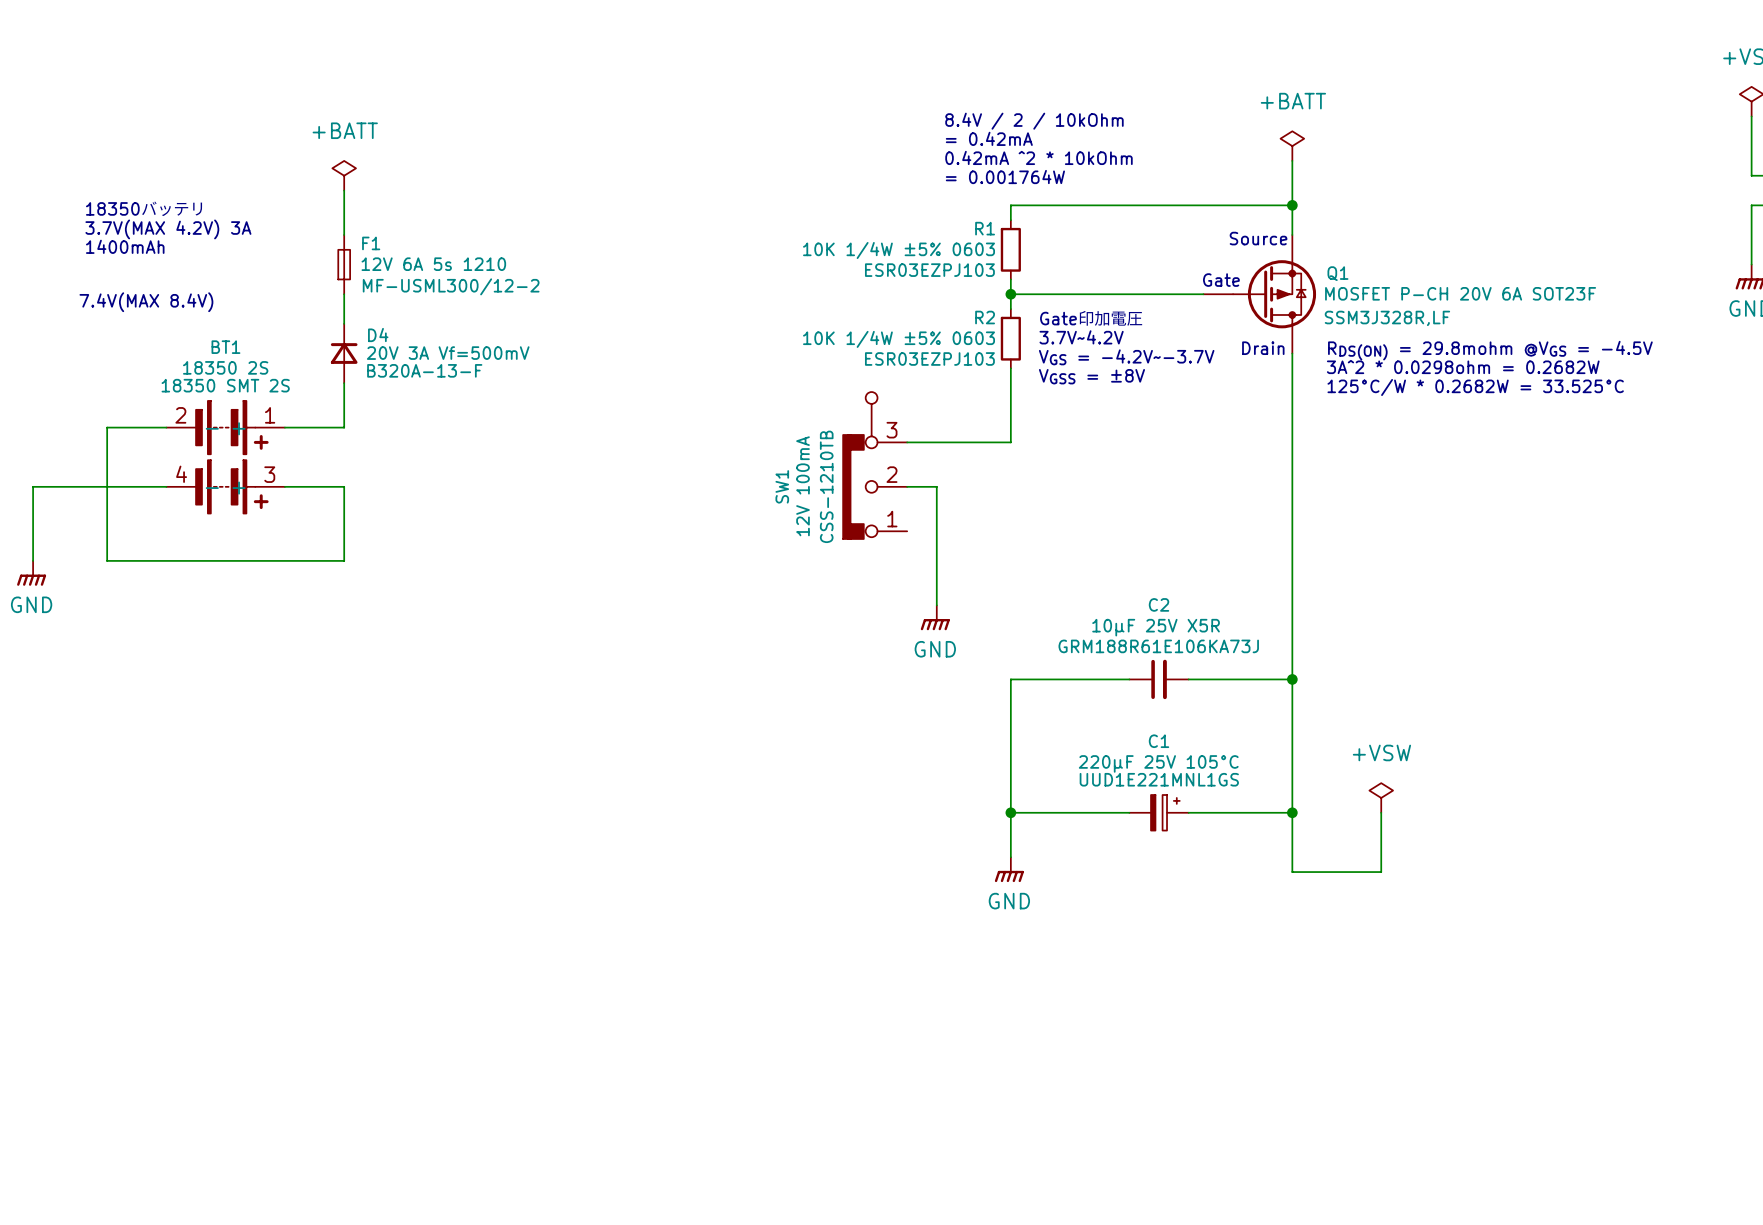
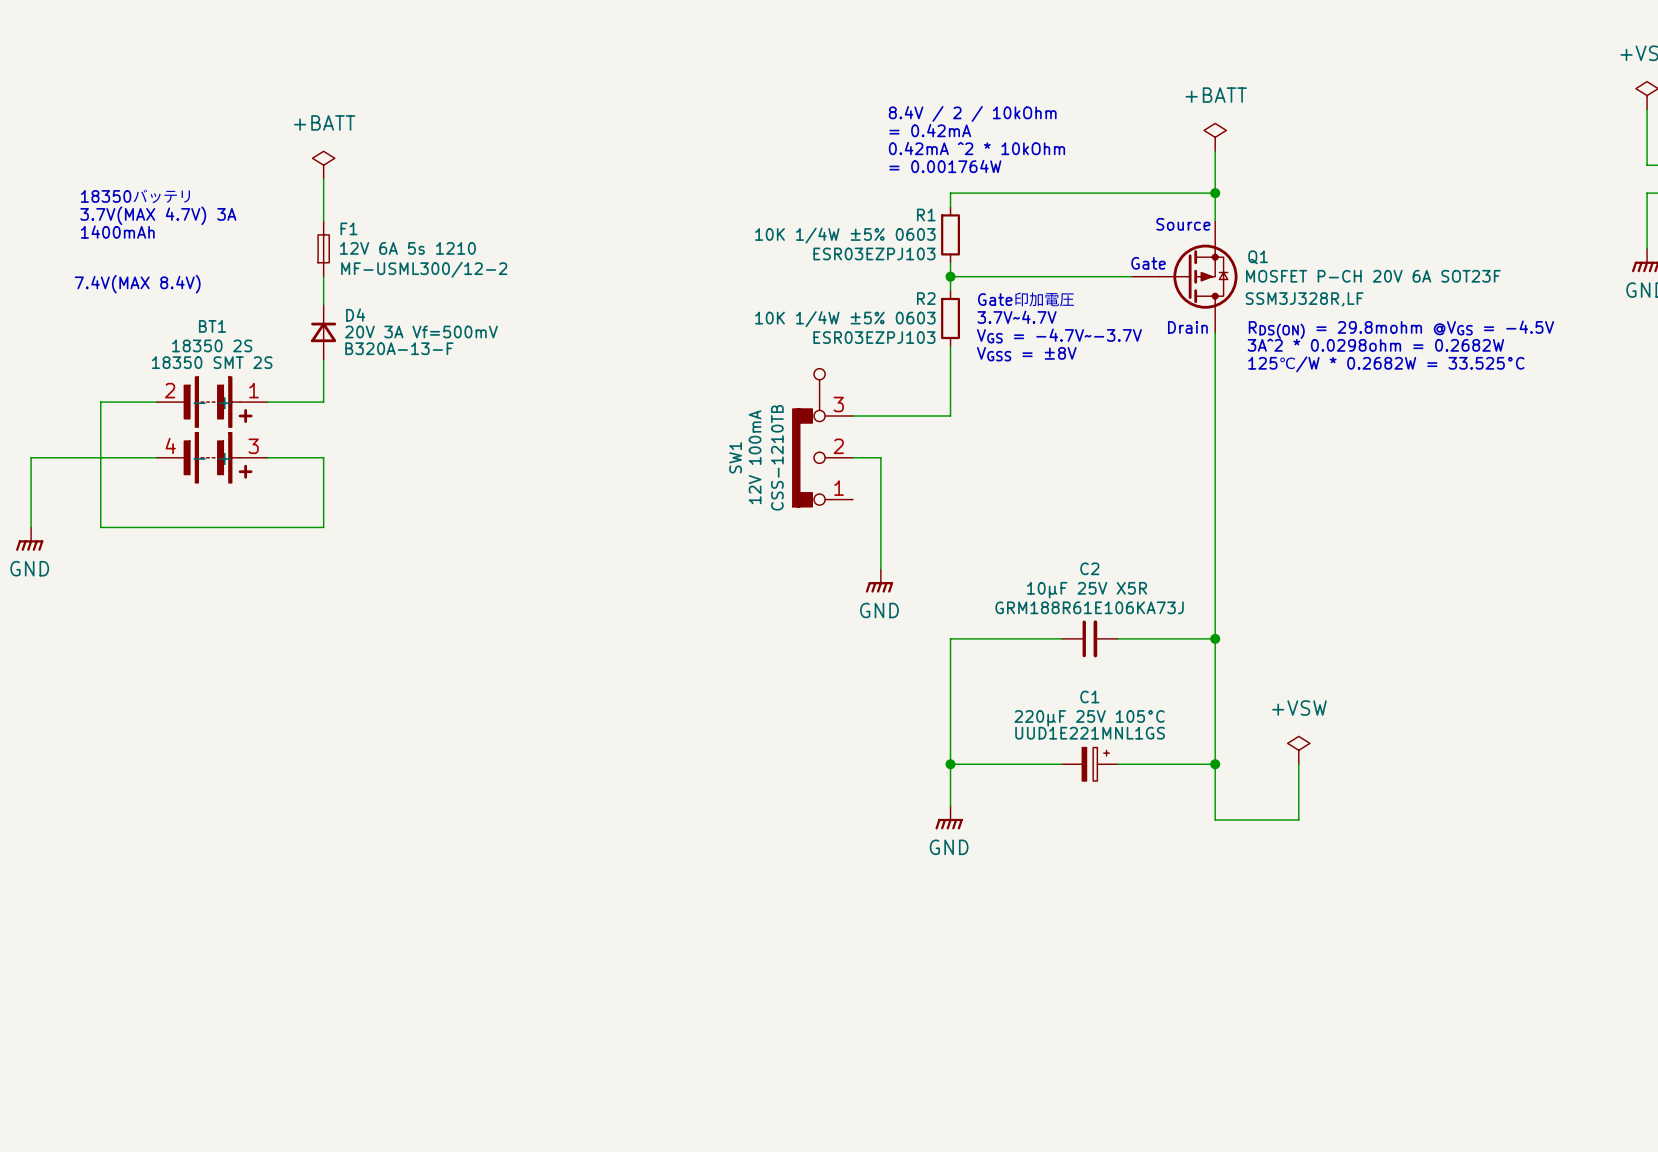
text: 3.7V(MAX 4.2V) 3A (168, 229) -> 3.7V(MAX 4.7V) 3A (158, 215)
text: 3.7V~4.2V (1081, 337) -> 3.7V~4.7V (1017, 317)
text: VGS = -4.2V~-3.7V (1126, 357) -> VGS = -4.7V~-3.7V (1059, 336)
text: 125°C/W * 0.2682W = 33.525°C (1475, 387) -> 125℃/W * 0.2682W = 33.525°C (1386, 364)

